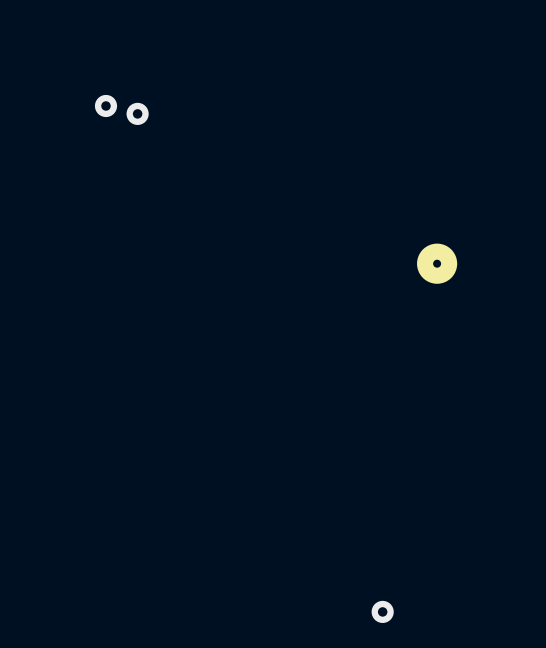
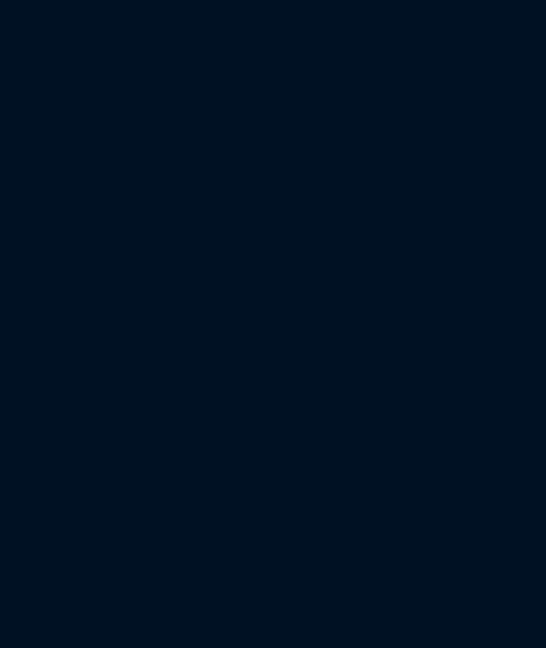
via: (105, 105) -> none
via: (137, 113) -> none
part: (437, 263) -> none
via: (382, 611) -> none

